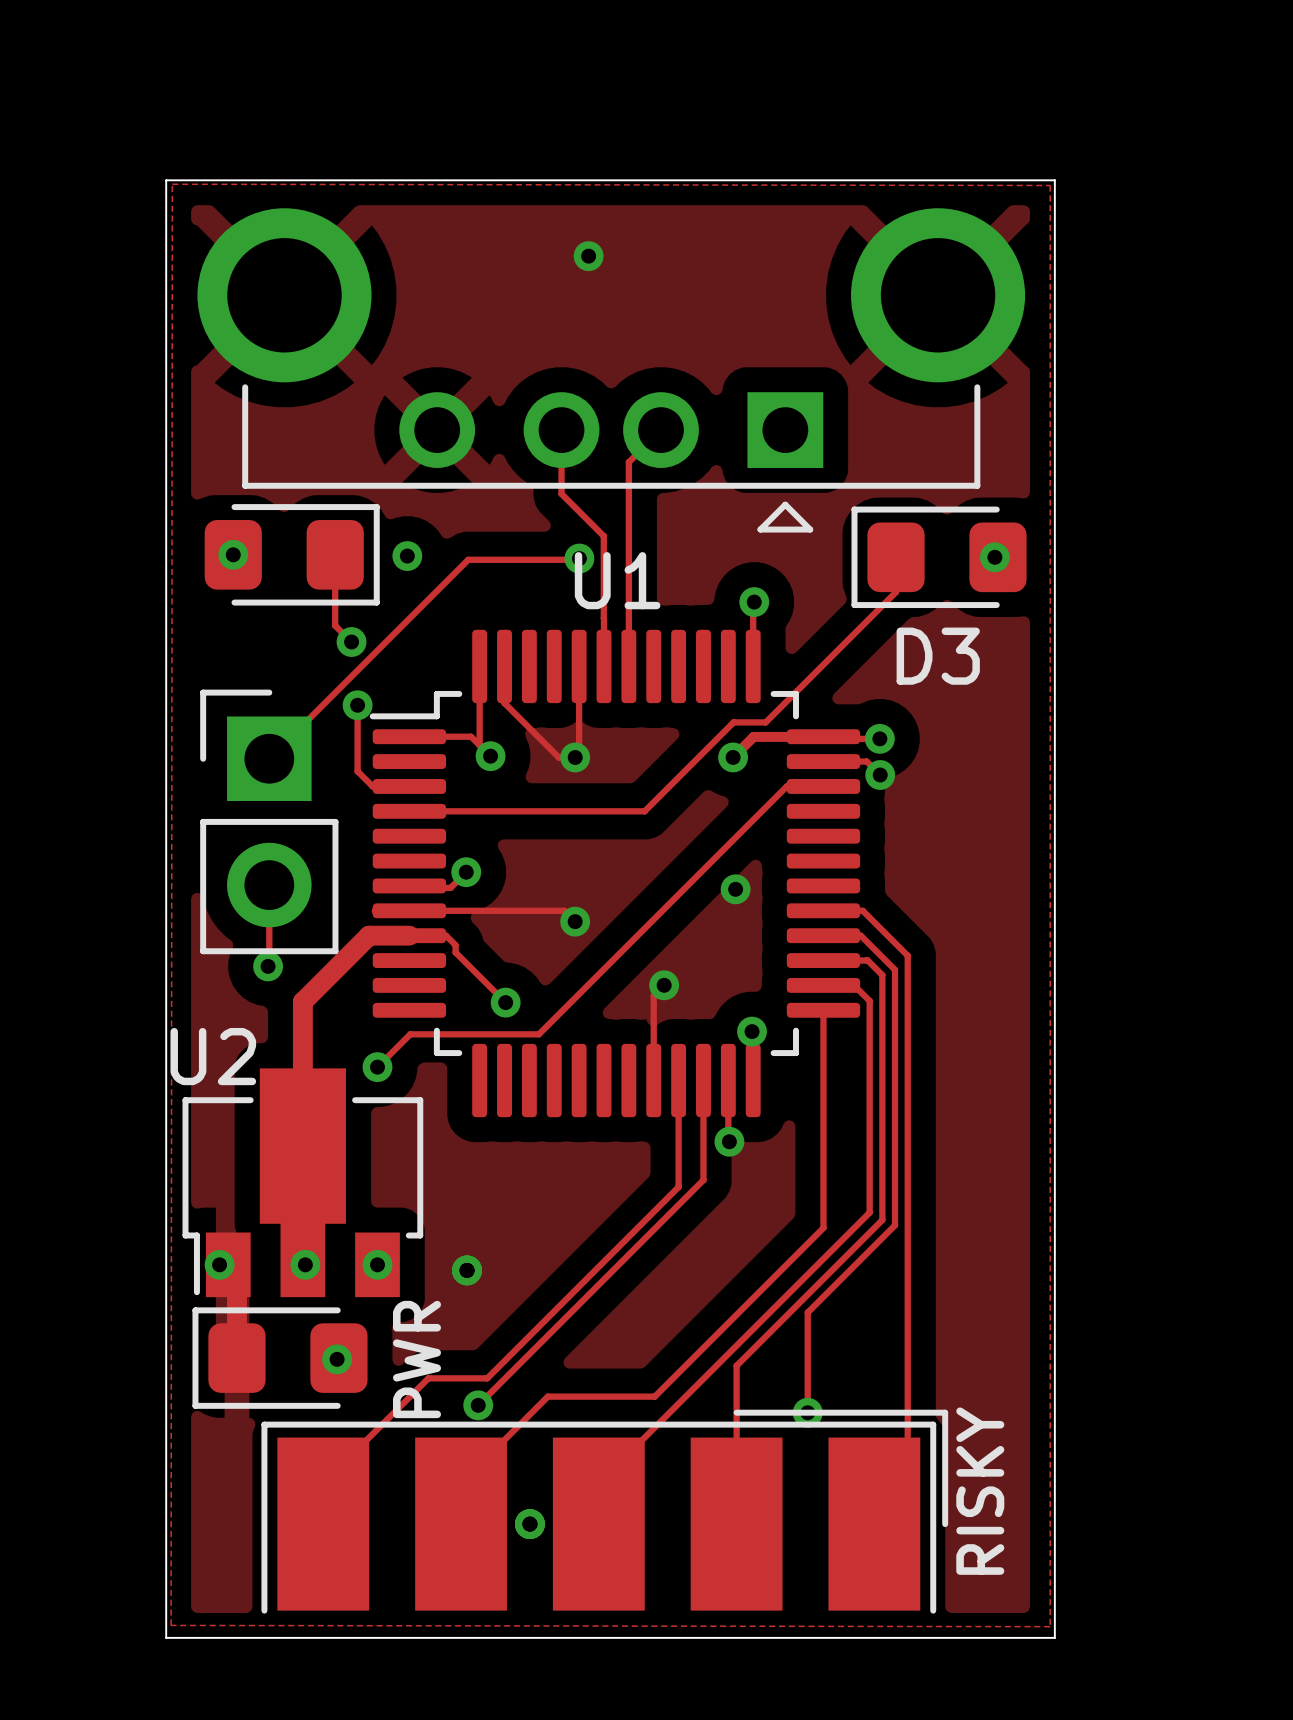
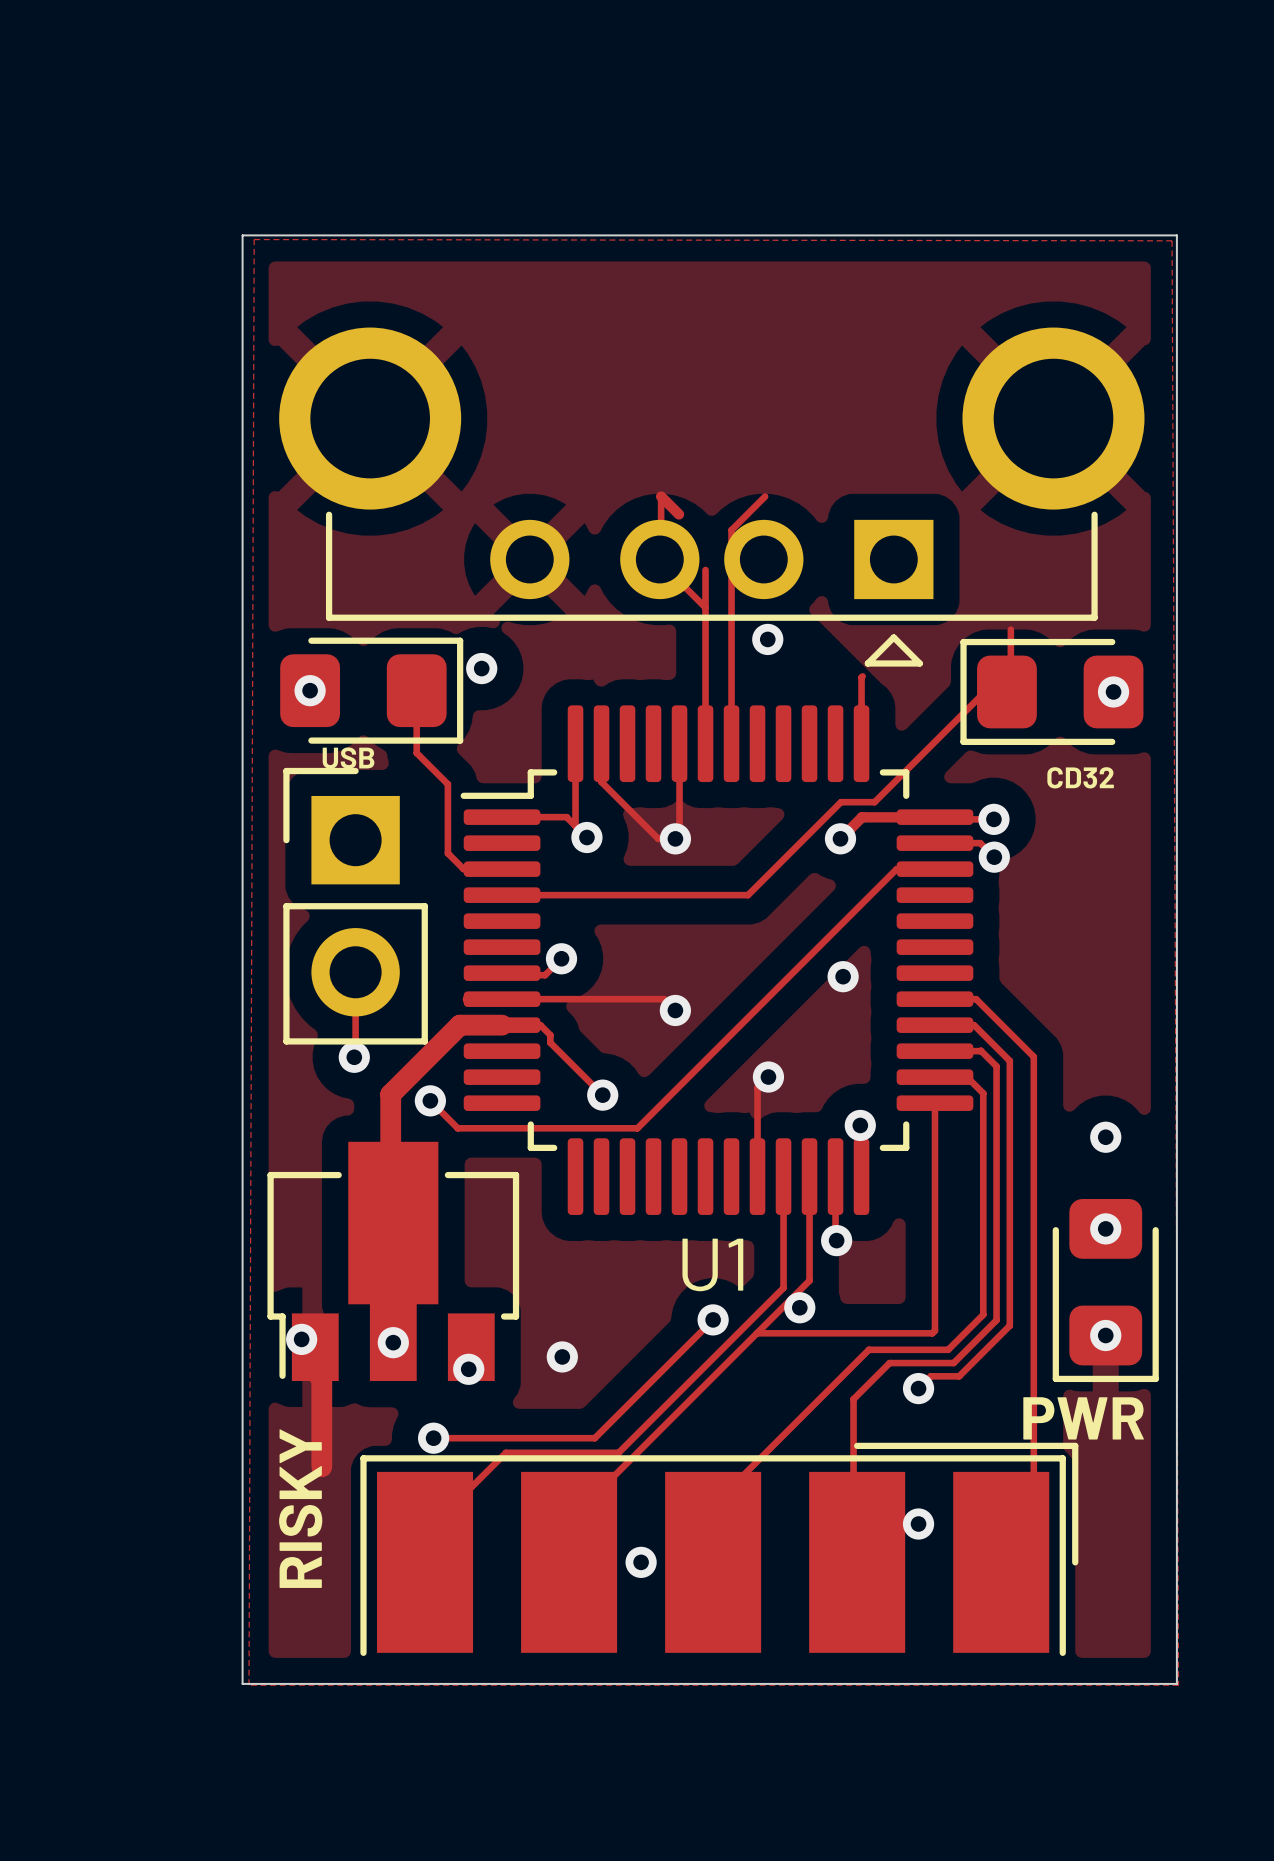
board edge: (166, 180) (166, 1637) (1054, 1637) (1054, 1565) -> (247, 235) (242, 235) (242, 1683) (1176, 1683)
zone outline: (172, 184) (171, 1625) (1050, 1626) (1050, 185) -> (254, 239) (249, 1685) (1178, 1685) (1172, 240)
via: (588, 256) -> none
part position: (611, 370) -> (711, 497)
via position: (233, 554) -> (310, 690)
part position: (292, 554) -> (371, 690)
track: (335, 554) (335, 625) (351, 642) -> none
via: (407, 556) -> none
D3: (939, 557) -> none
via position: (994, 557) -> (1113, 691)
track: (579, 558) (468, 559) (269, 758) -> none
via: (579, 558) -> none
via: none -> (767, 639)
U1 name position: U1 (617, 580) -> U1 (712, 1264)
via: none -> (481, 668)
via: (754, 602) -> none
track: none -> (416, 690) (416, 753) (447, 784)
part: none -> (1051, 691)
via: (351, 642) -> none
text: none -> USB (348, 758)
text: none -> CD32 (1080, 777)
via: (357, 705) -> none
track: (907, 955) (907, 1490) (874, 1524) (874, 1461) -> (1023, 1046) (1033, 1056) (1033, 1515) (996, 1553)
track: (410, 1034) (377, 1067) -> (503, 1128) (457, 1128) (430, 1100)
via: none -> (1105, 1137)
U2 name: U2 (213, 1056) -> none
via position: (377, 1067) -> (430, 1100)
via: none -> (1105, 1228)
U2 position: (302, 1182) -> (393, 1261)
part: none -> (1105, 1290)
via: none -> (799, 1307)
track: none -> (713, 1319) (594, 1438) (433, 1438)
via: none -> (713, 1319)
track: (882, 1217) (882, 1220) (736, 1365) (736, 1524) -> (996, 1320) (953, 1363) (889, 1363) (853, 1399) (851, 1553)
track: (895, 1223) (895, 1225) (807, 1312) (807, 1412) -> (1009, 1325) (959, 1376) (930, 1376) (918, 1388)
track: (821, 1230) (654, 1396) (547, 1396) (461, 1483) (461, 1524) -> (932, 1333) (756, 1333)
via: none -> (1105, 1335)
track: (836, 1246) (598, 1483) (598, 1524) -> (948, 1349) (868, 1349) (707, 1510) (707, 1553)
via position: (219, 1264) -> (301, 1339)
via position: (305, 1264) -> (393, 1342)
via position: (467, 1270) -> (562, 1356)
via: none -> (918, 1388)
track: (520, 1344) (487, 1378) (428, 1378) (323, 1483) (323, 1524) -> (618, 1452) (505, 1452) (419, 1538) (419, 1553)
part: (280, 1358) -> none
via position: (337, 1359) -> (433, 1438)
text rotation: 0° (417, 1359) -> 90° clockwise (1083, 1418)
text position: PWR (417, 1359) -> PWR (1083, 1418)
via: (478, 1405) -> none
via: none -> (641, 1562)
text position: RISKY (980, 1491) -> RISKY (300, 1508)
part position: (604, 1511) -> (719, 1549)
via: (529, 1524) -> none

